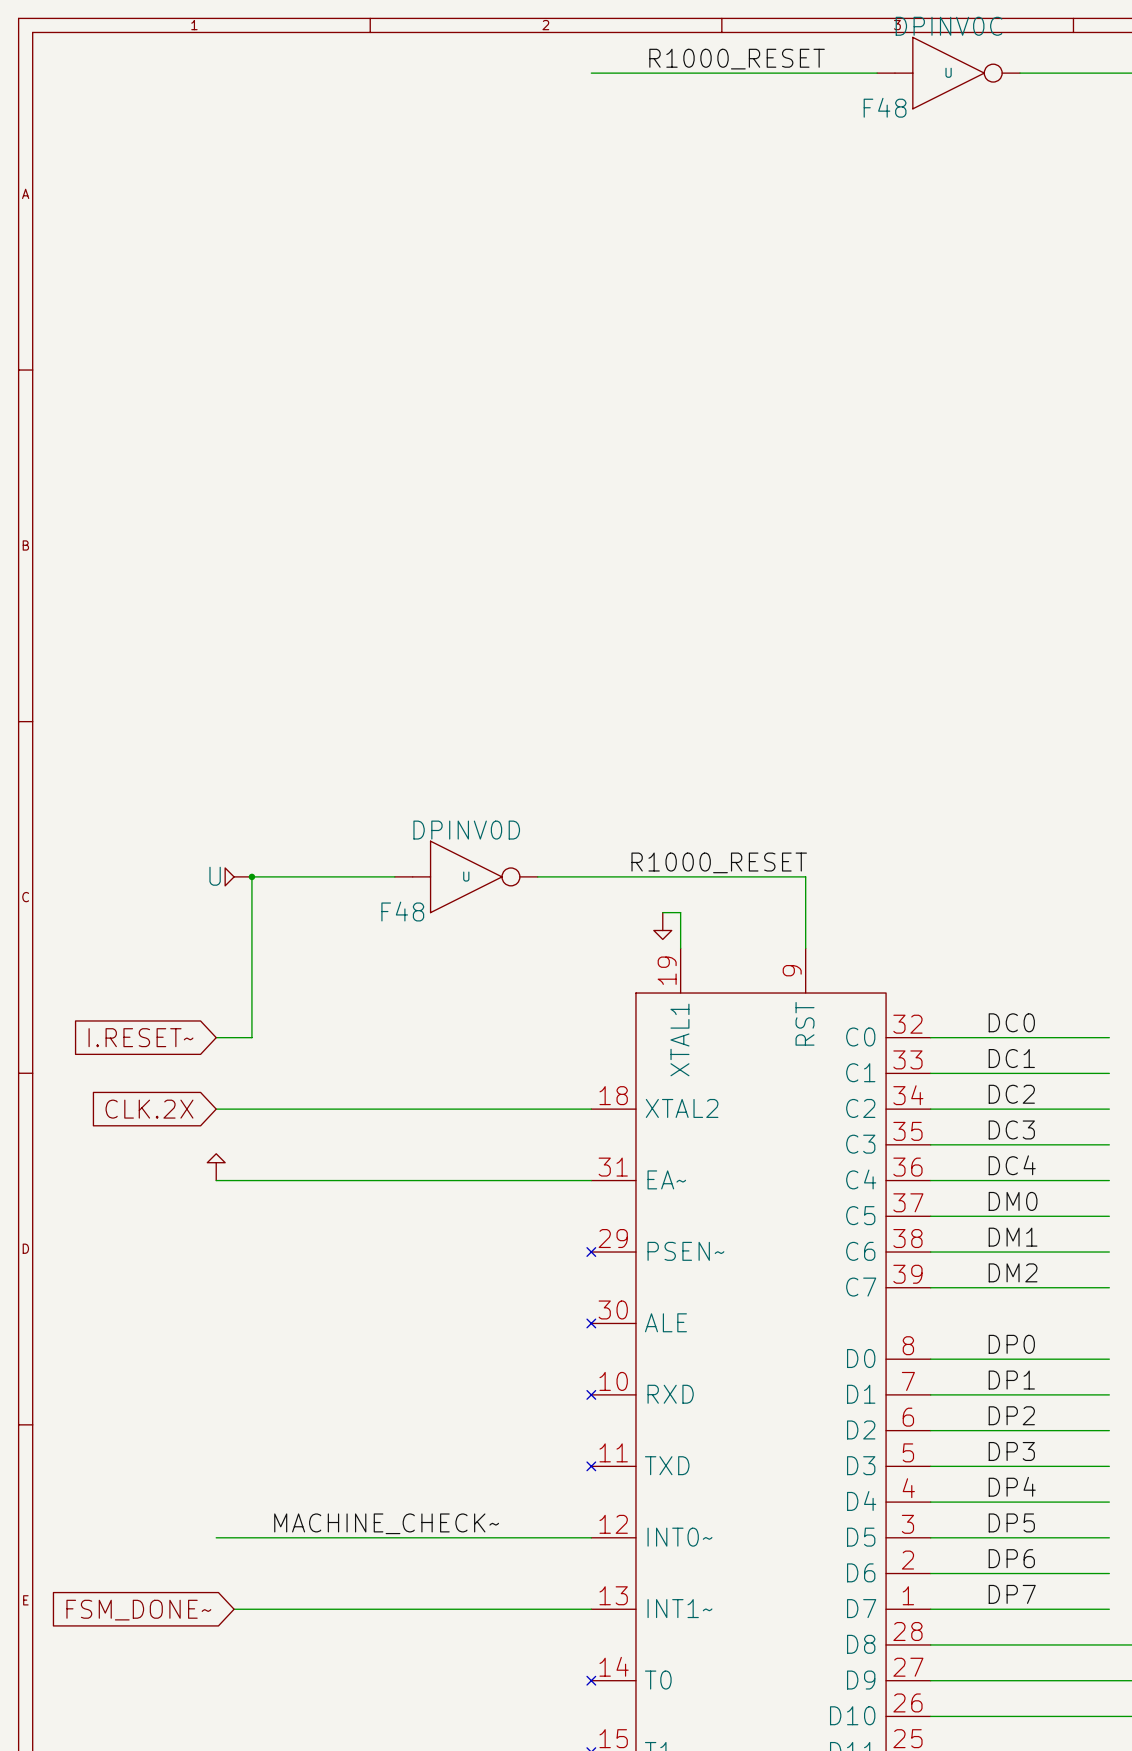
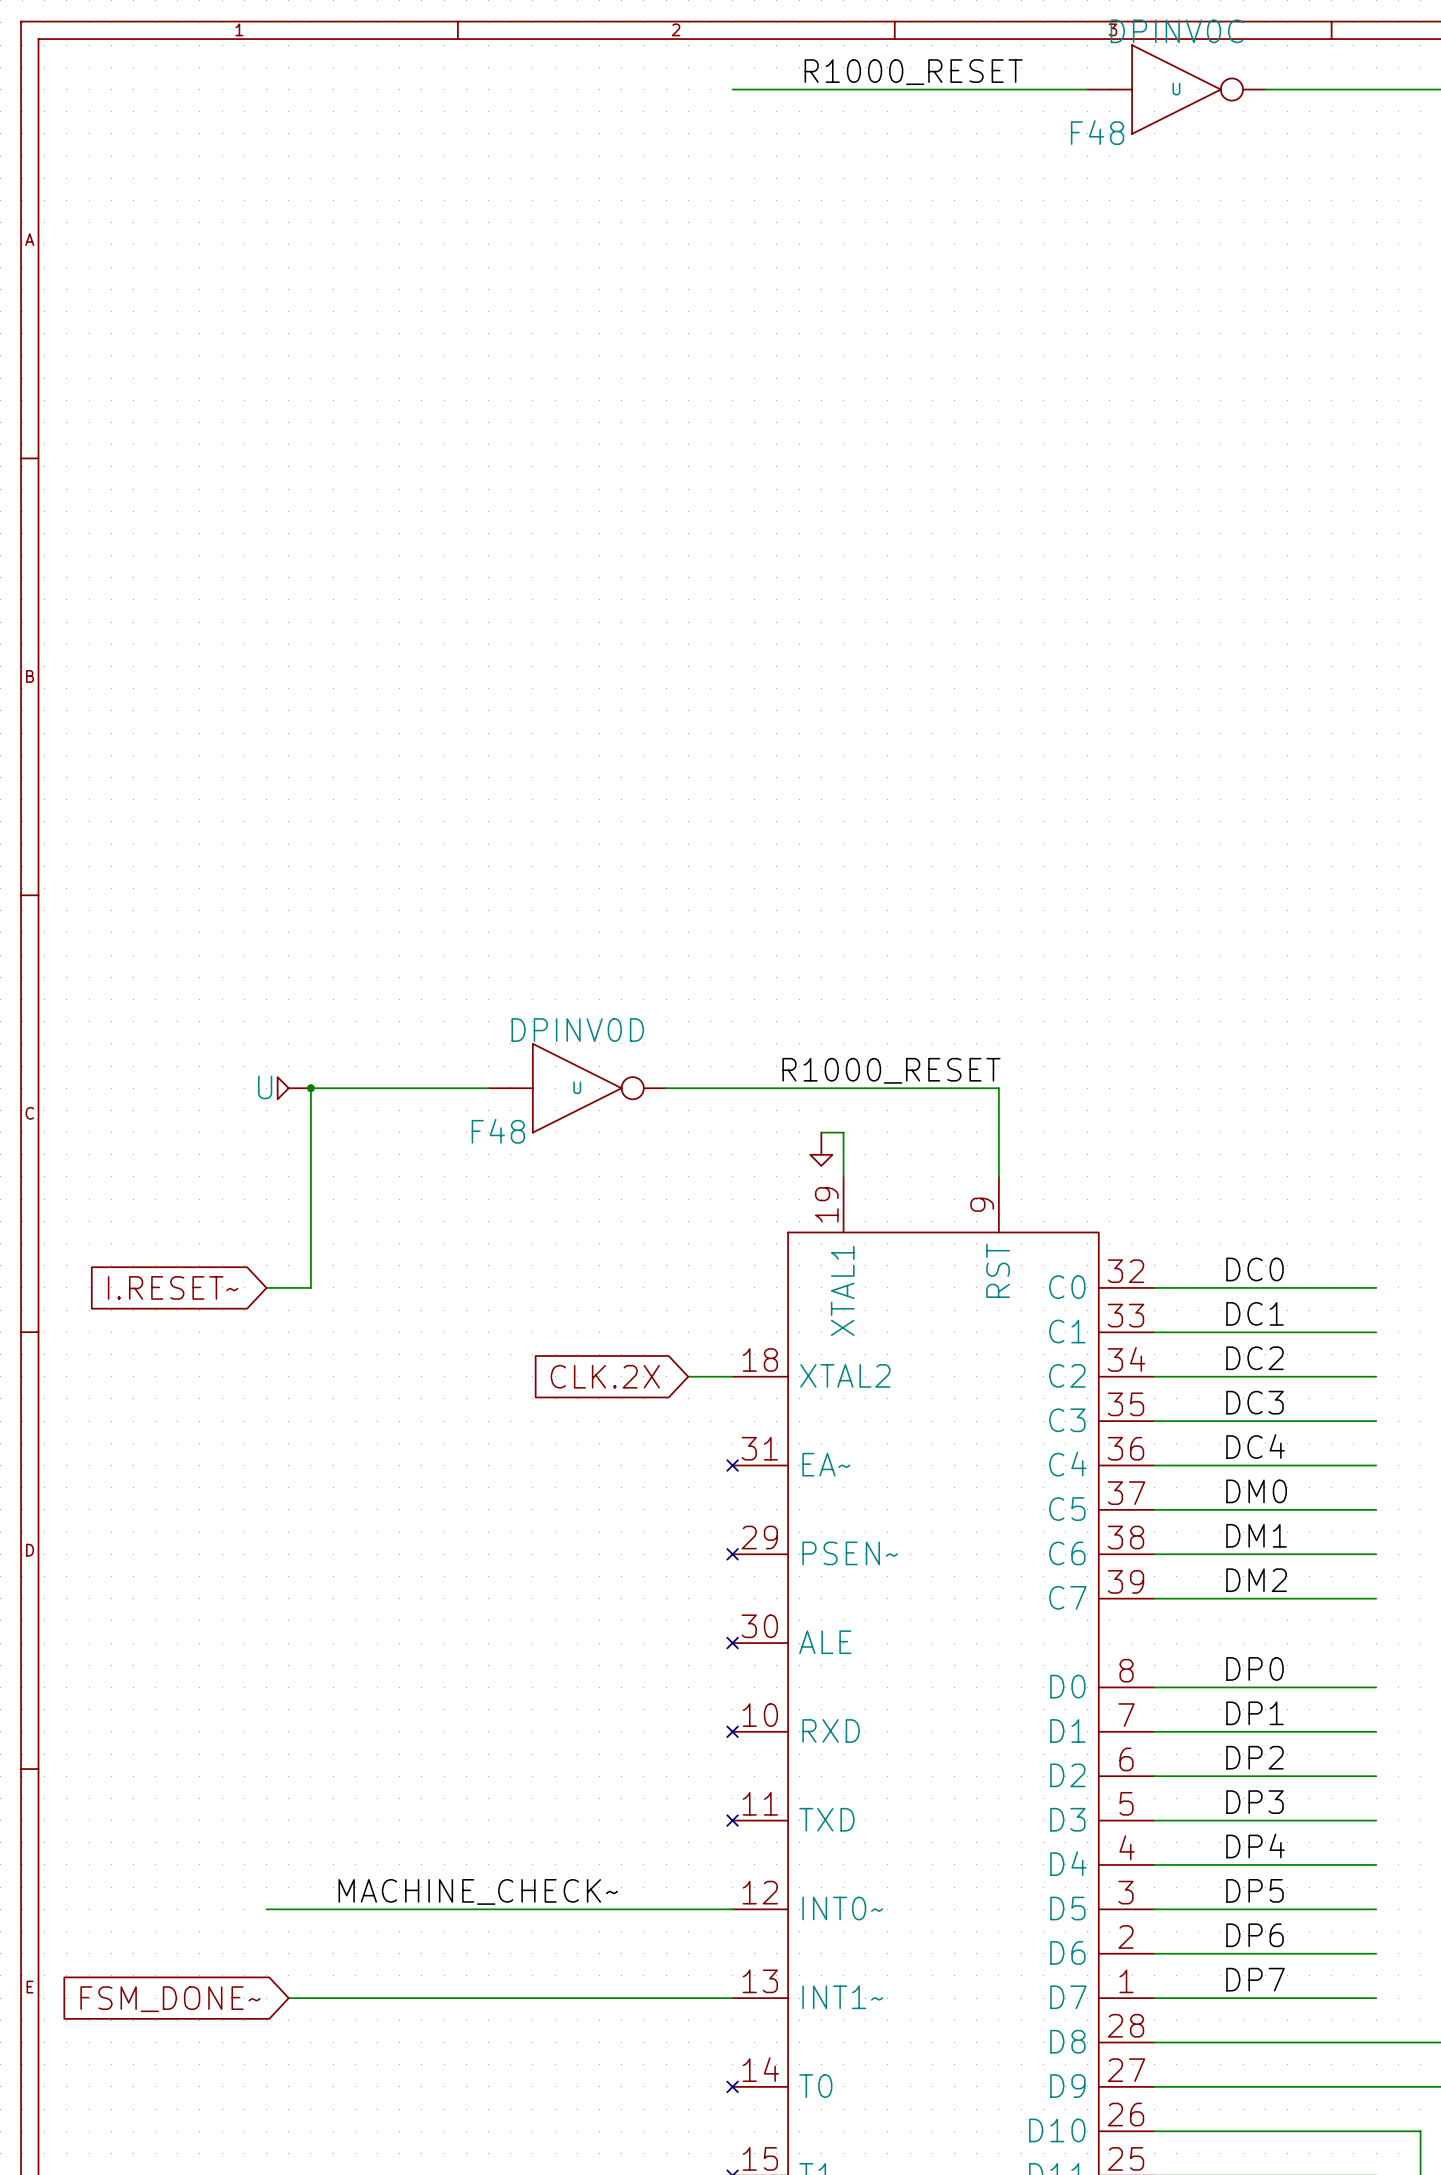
global label: CLK.2X (149, 1109) -> none
wire: (216, 1109) (555, 1109) -> none
global label: none -> CLK.2X (605, 1376)
power symbol: (216, 1166) -> none
wire: (216, 1180) (591, 1180) -> none
no-connect mark: none -> (732, 1465)

